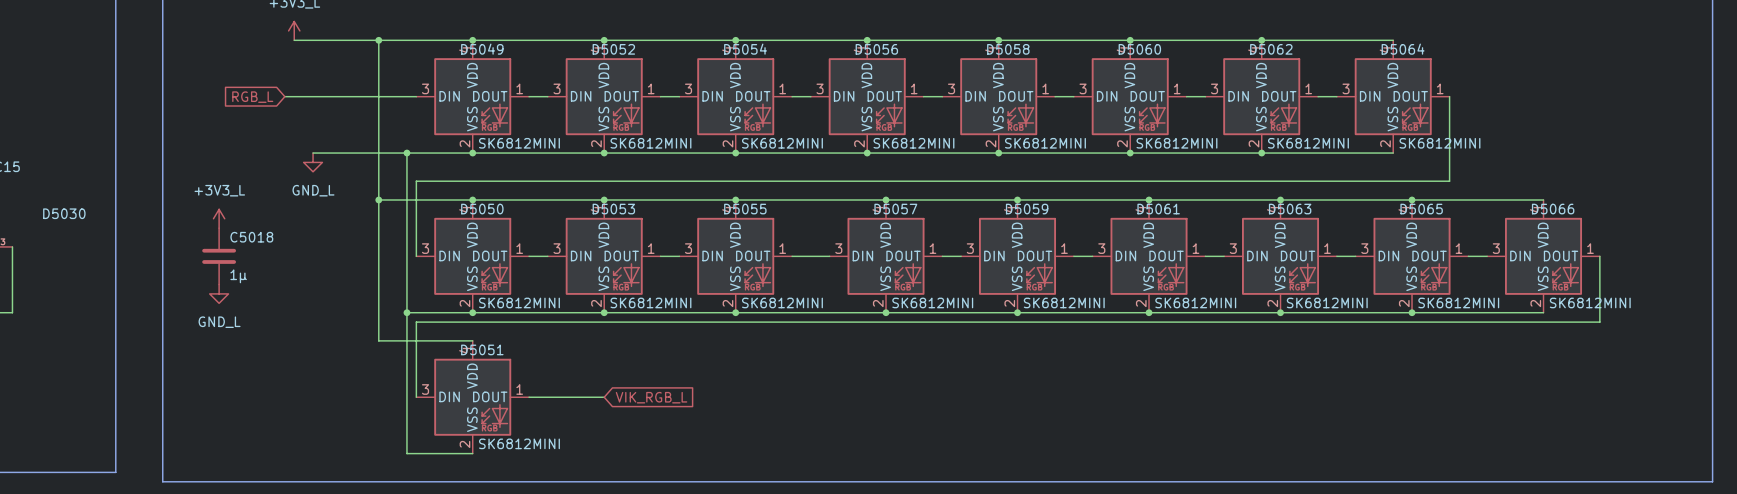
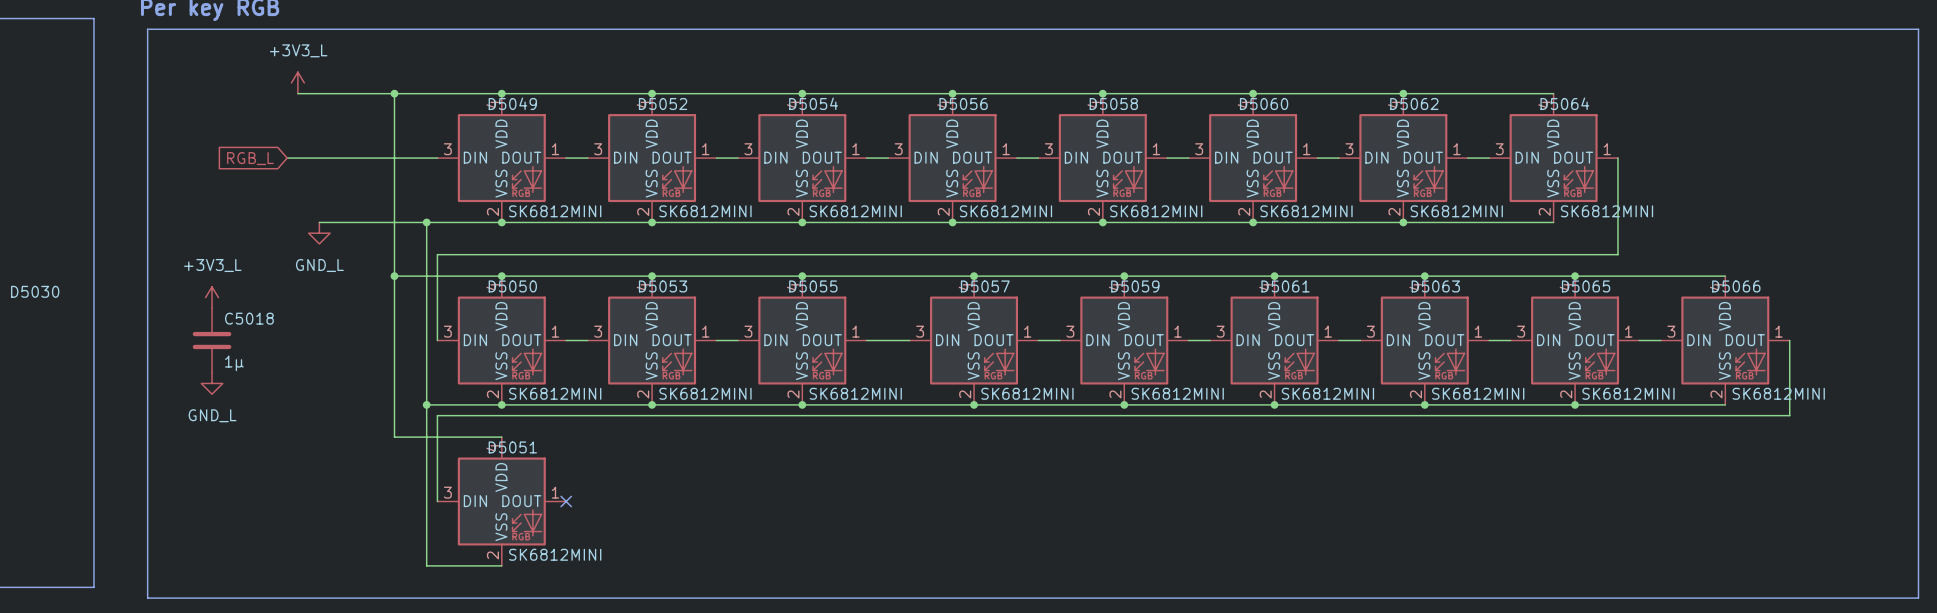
wire: (529, 397) (604, 397) -> none
no-connect mark: none -> (566, 501)
global label: VIK_RGB_L (651, 397) -> none

